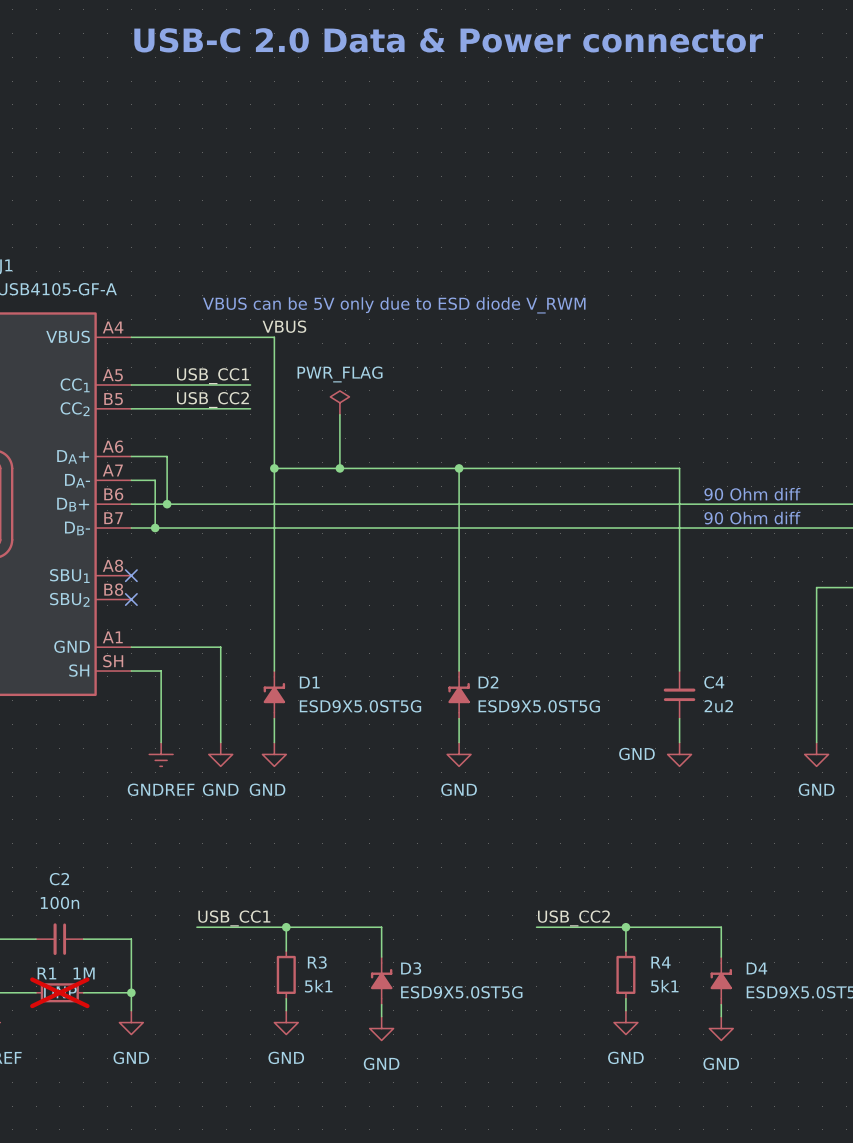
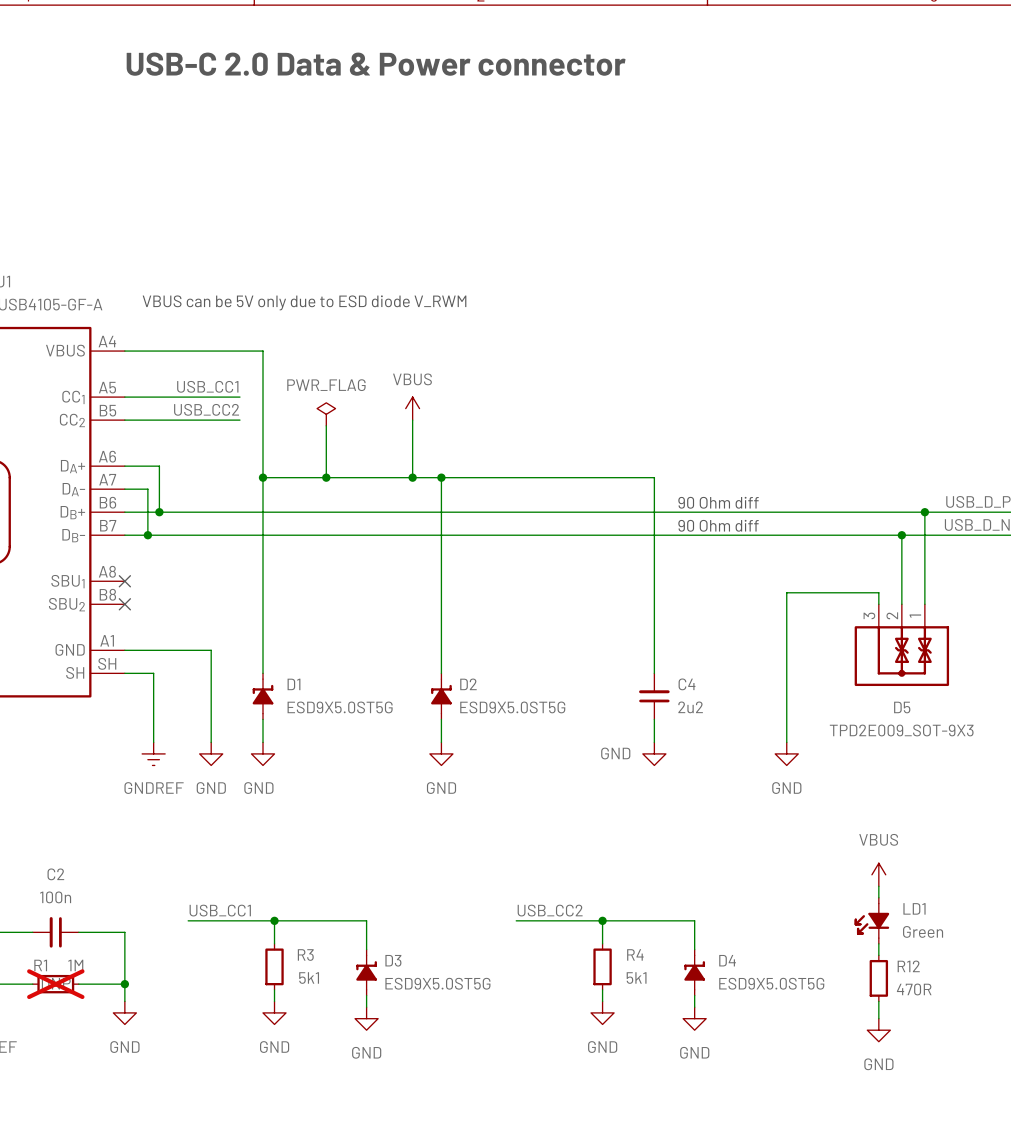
text position: VBUS can be 5V only due to ESD diode V_RWM (394, 305) -> VBUS can be 5V only due to ESD diode V_RWM (304, 302)
label: VBUS (284, 326) -> none
power symbol: none -> VBUS (412, 408)
wire: none -> (412, 420) (412, 477)
junction: none -> (412, 477)

